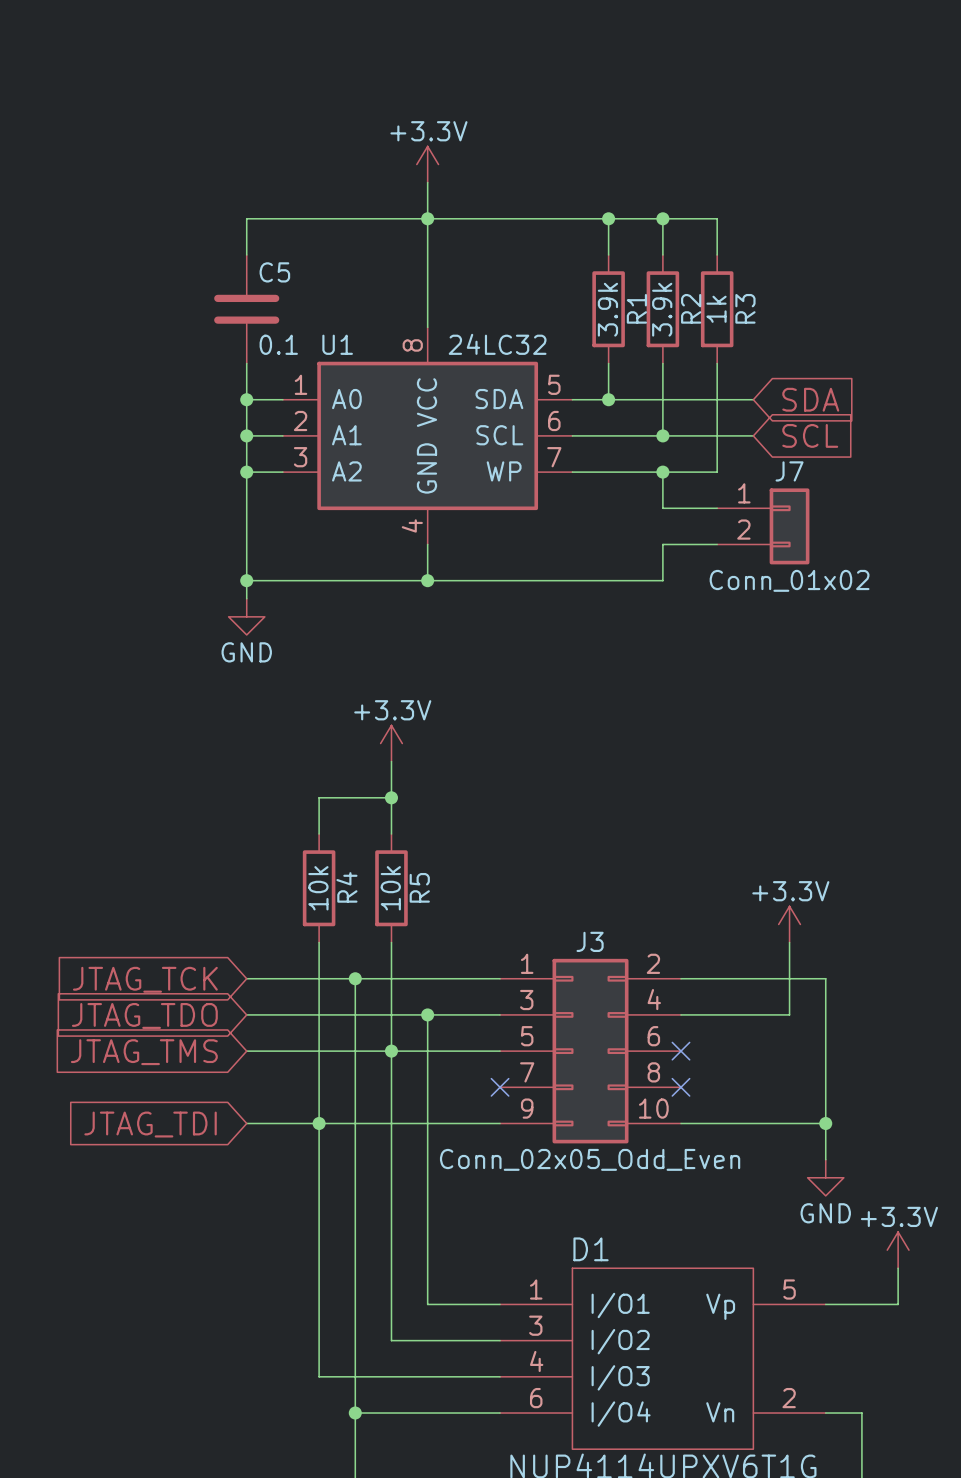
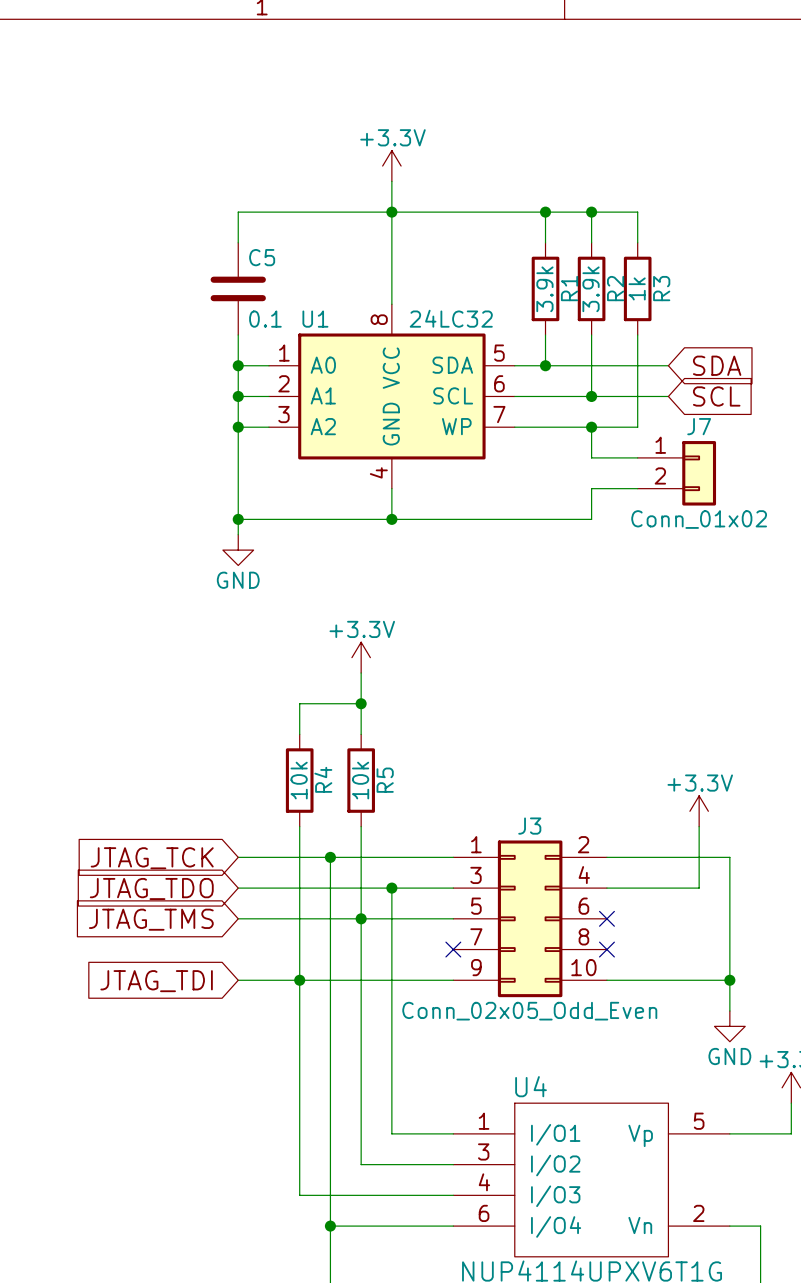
D1 name: D1 (591, 1249) -> U4 (531, 1086)

